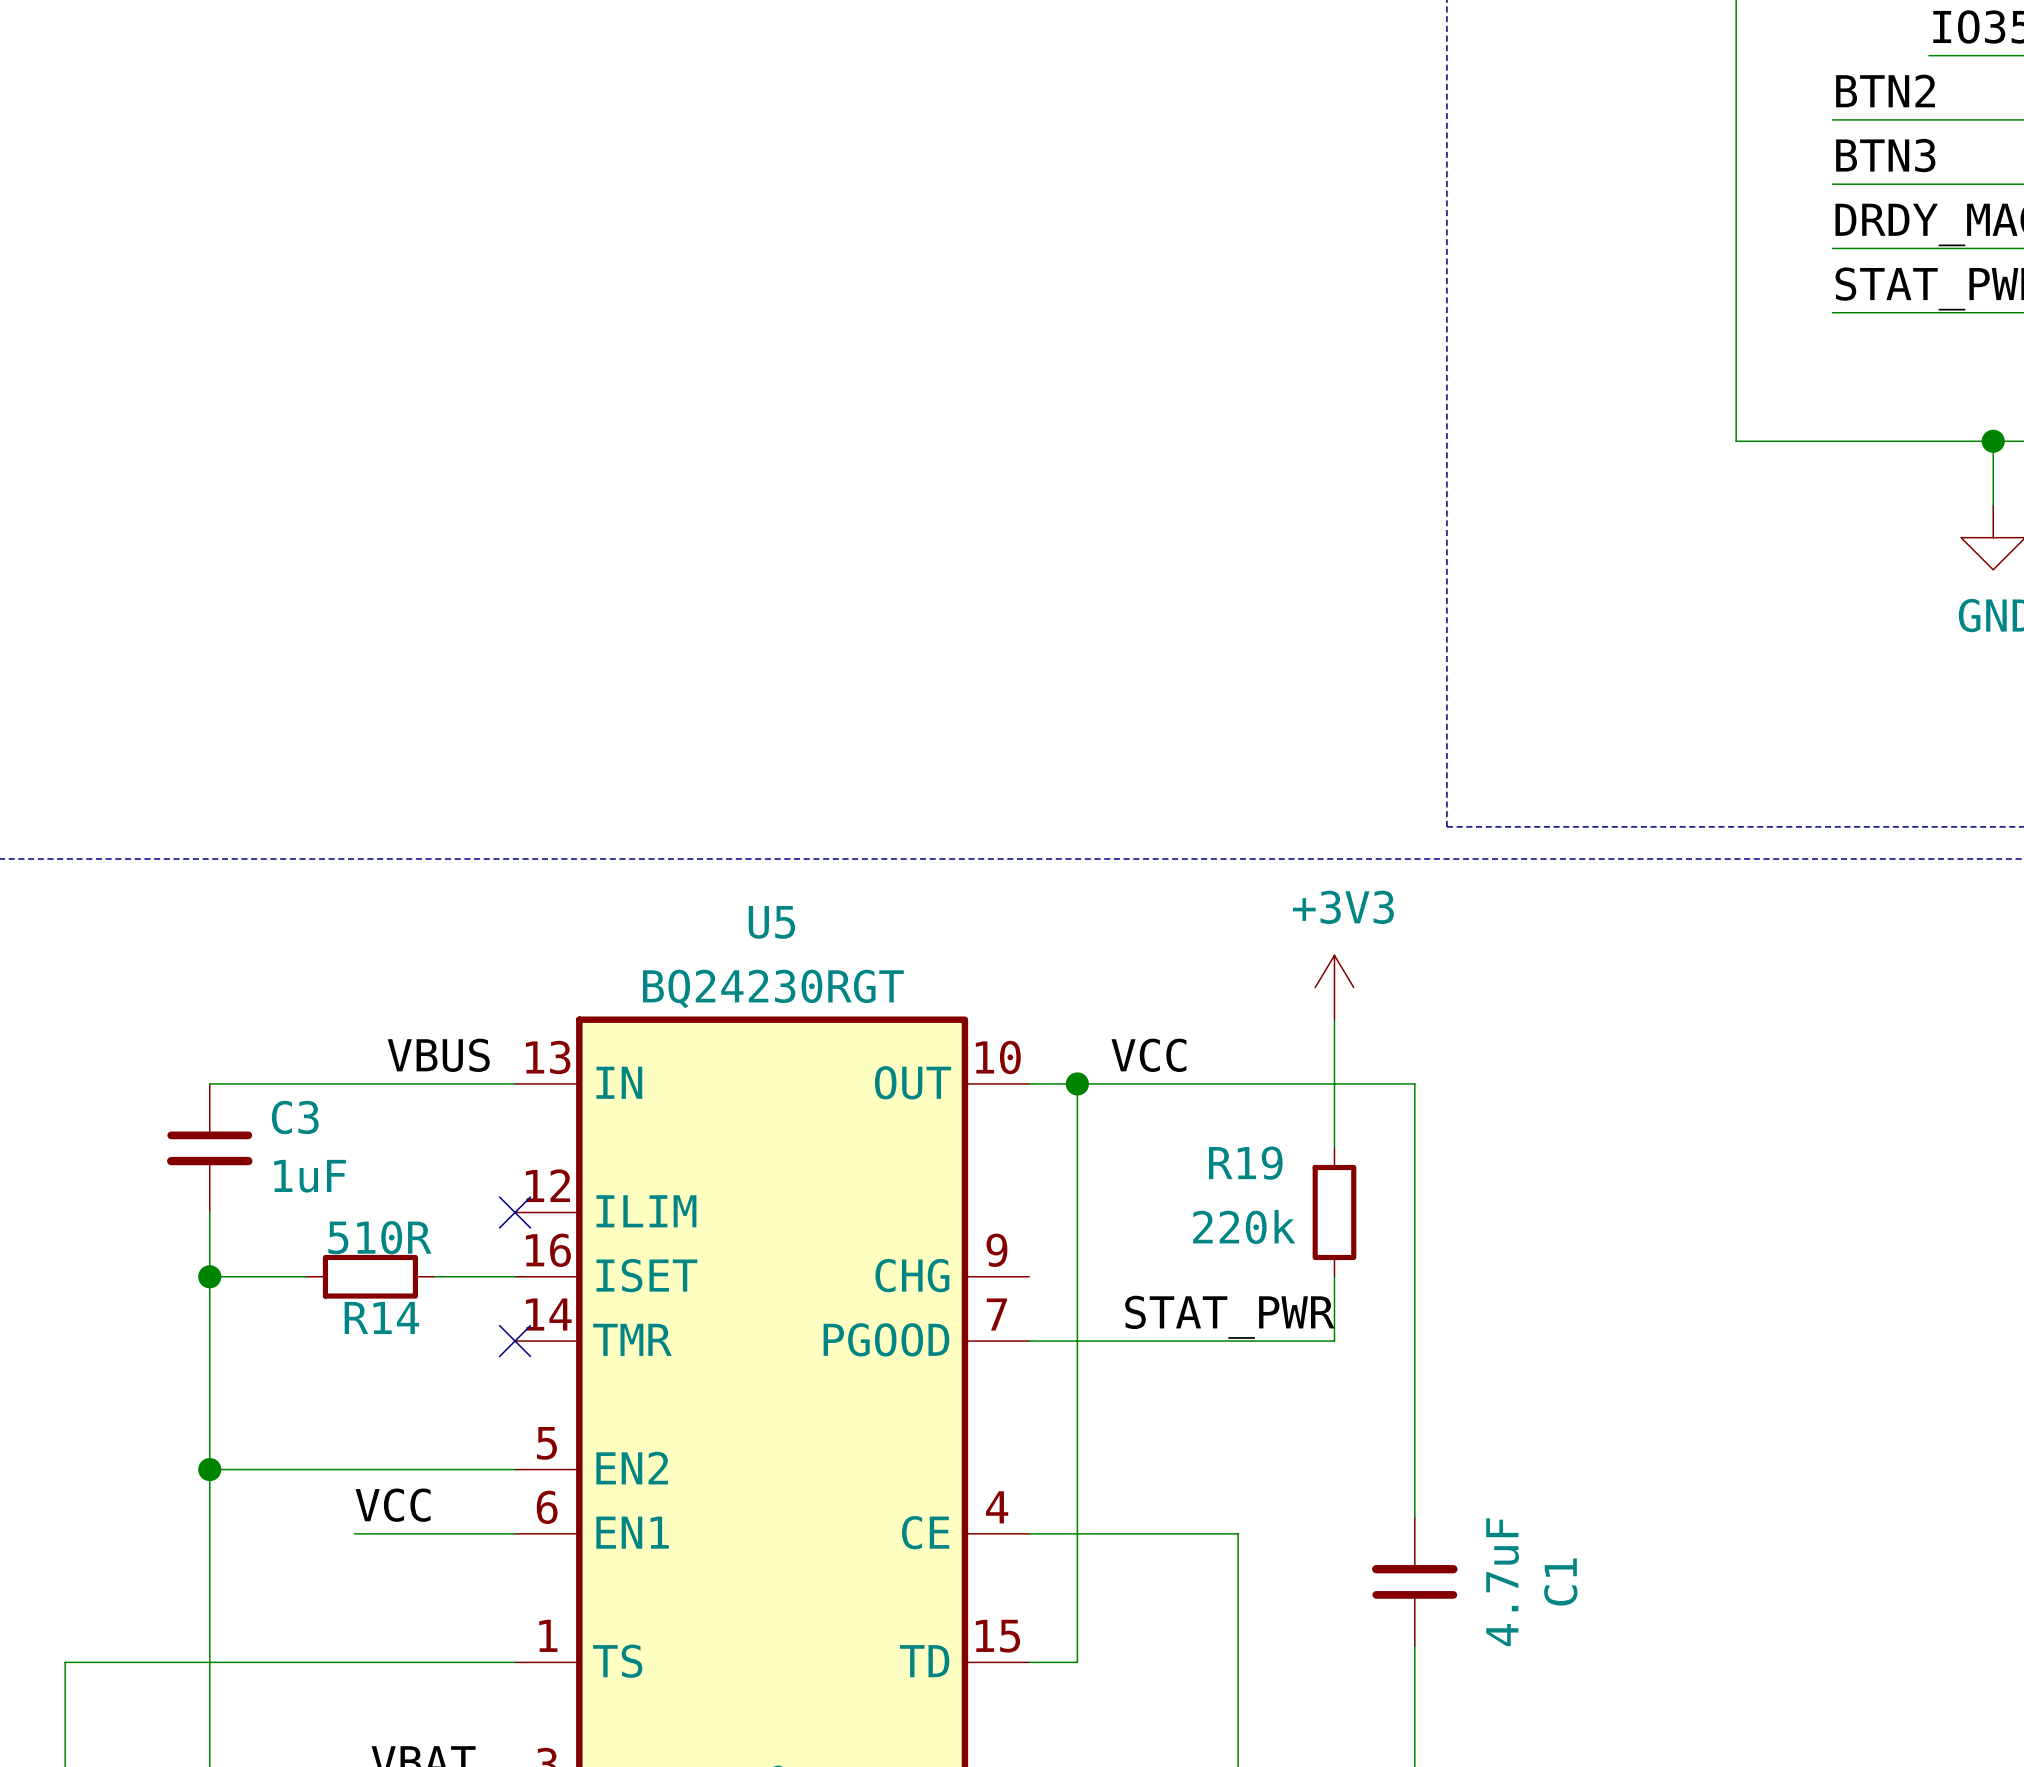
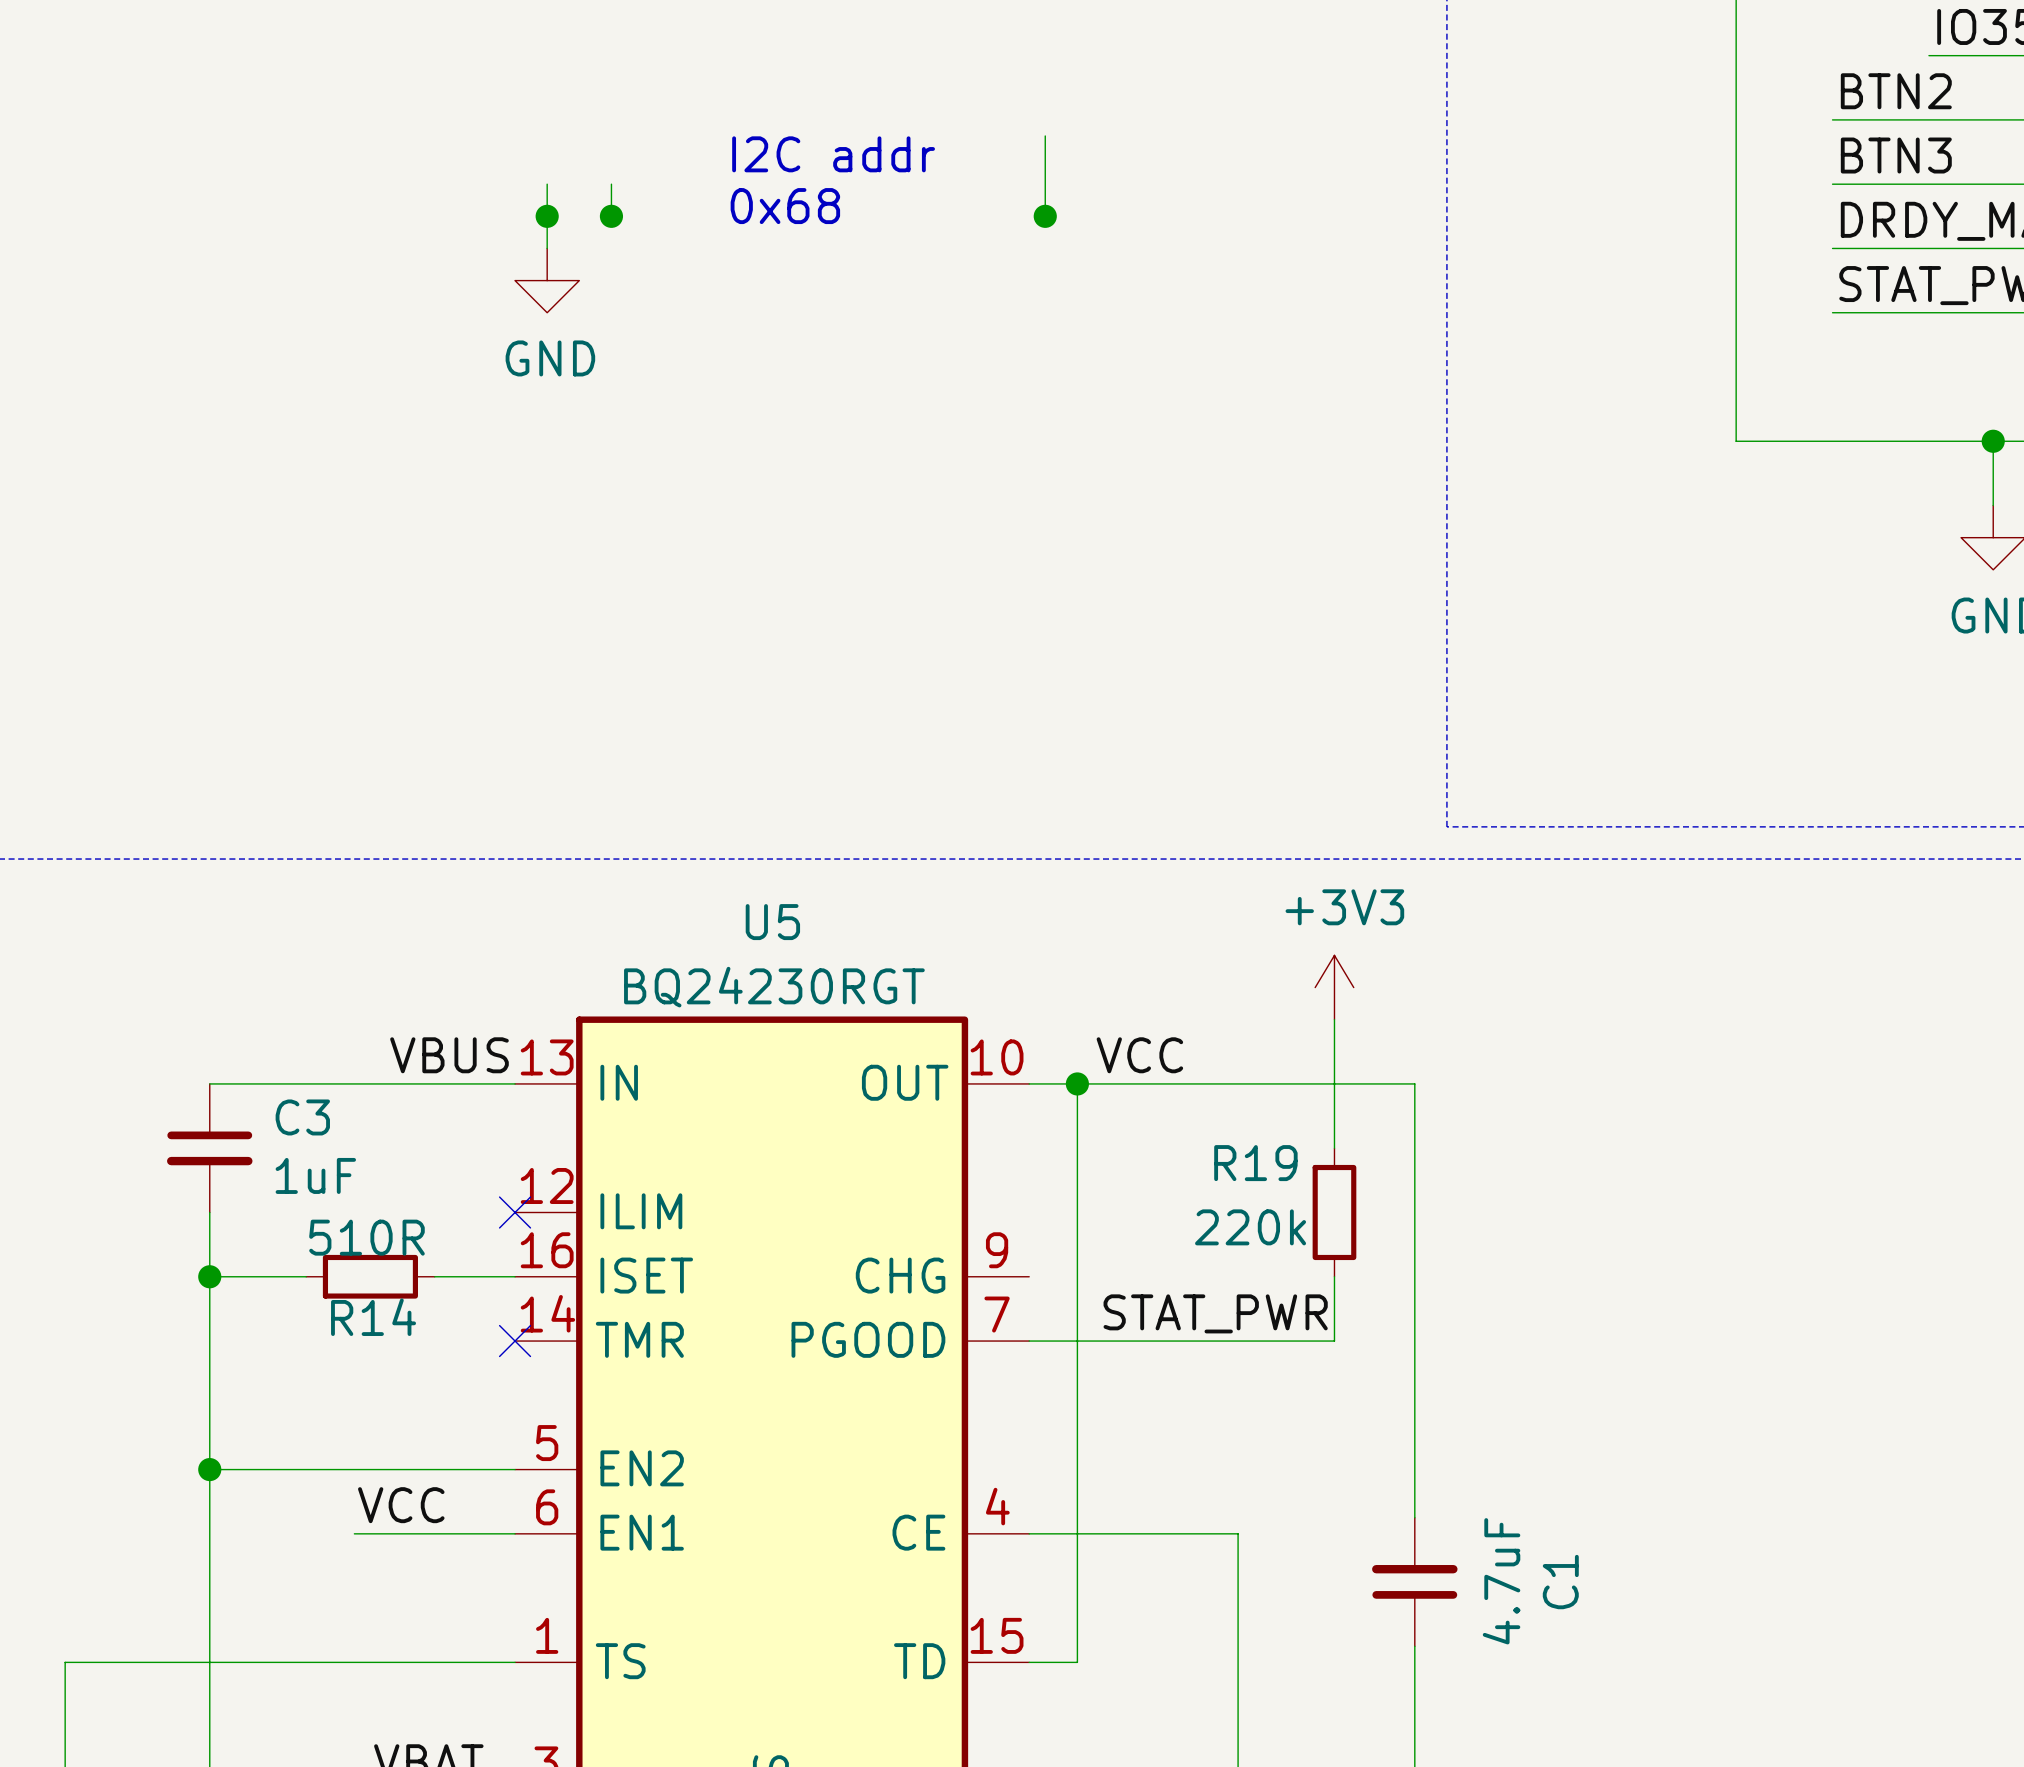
wire: none -> (1045, 135) (1045, 216)
text: none -> I2C addr (833, 154)
wire: none -> (547, 184) (547, 248)
wire: none -> (611, 184) (611, 216)
text: none -> 0x68 (785, 206)
junction: none -> (547, 216)
junction: none -> (611, 216)
junction: none -> (1045, 216)
power symbol: none -> GND (547, 280)

